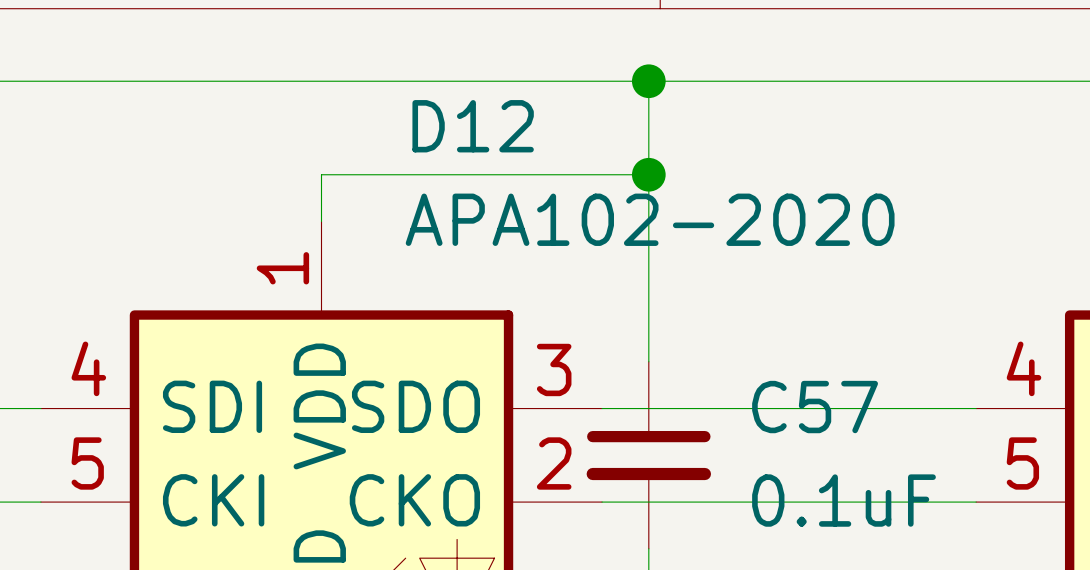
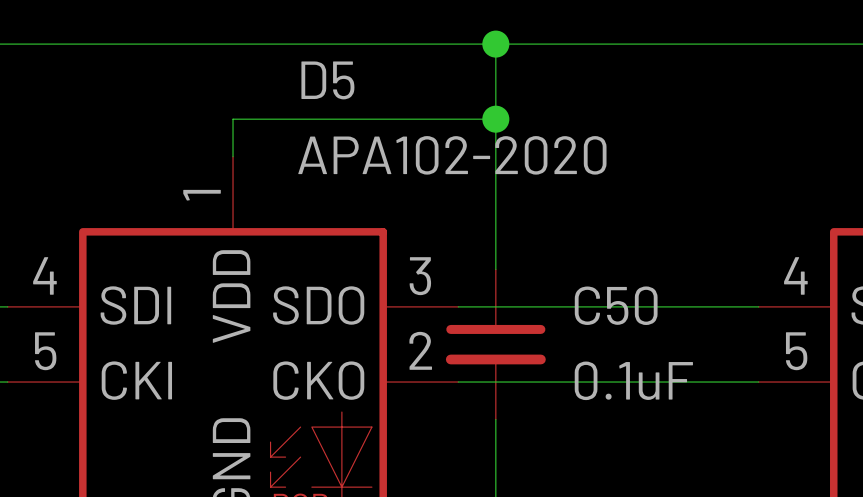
D12 name: D12 (473, 126) -> D5 (327, 80)
C57 name: C57 (815, 407) -> C50 (616, 305)

